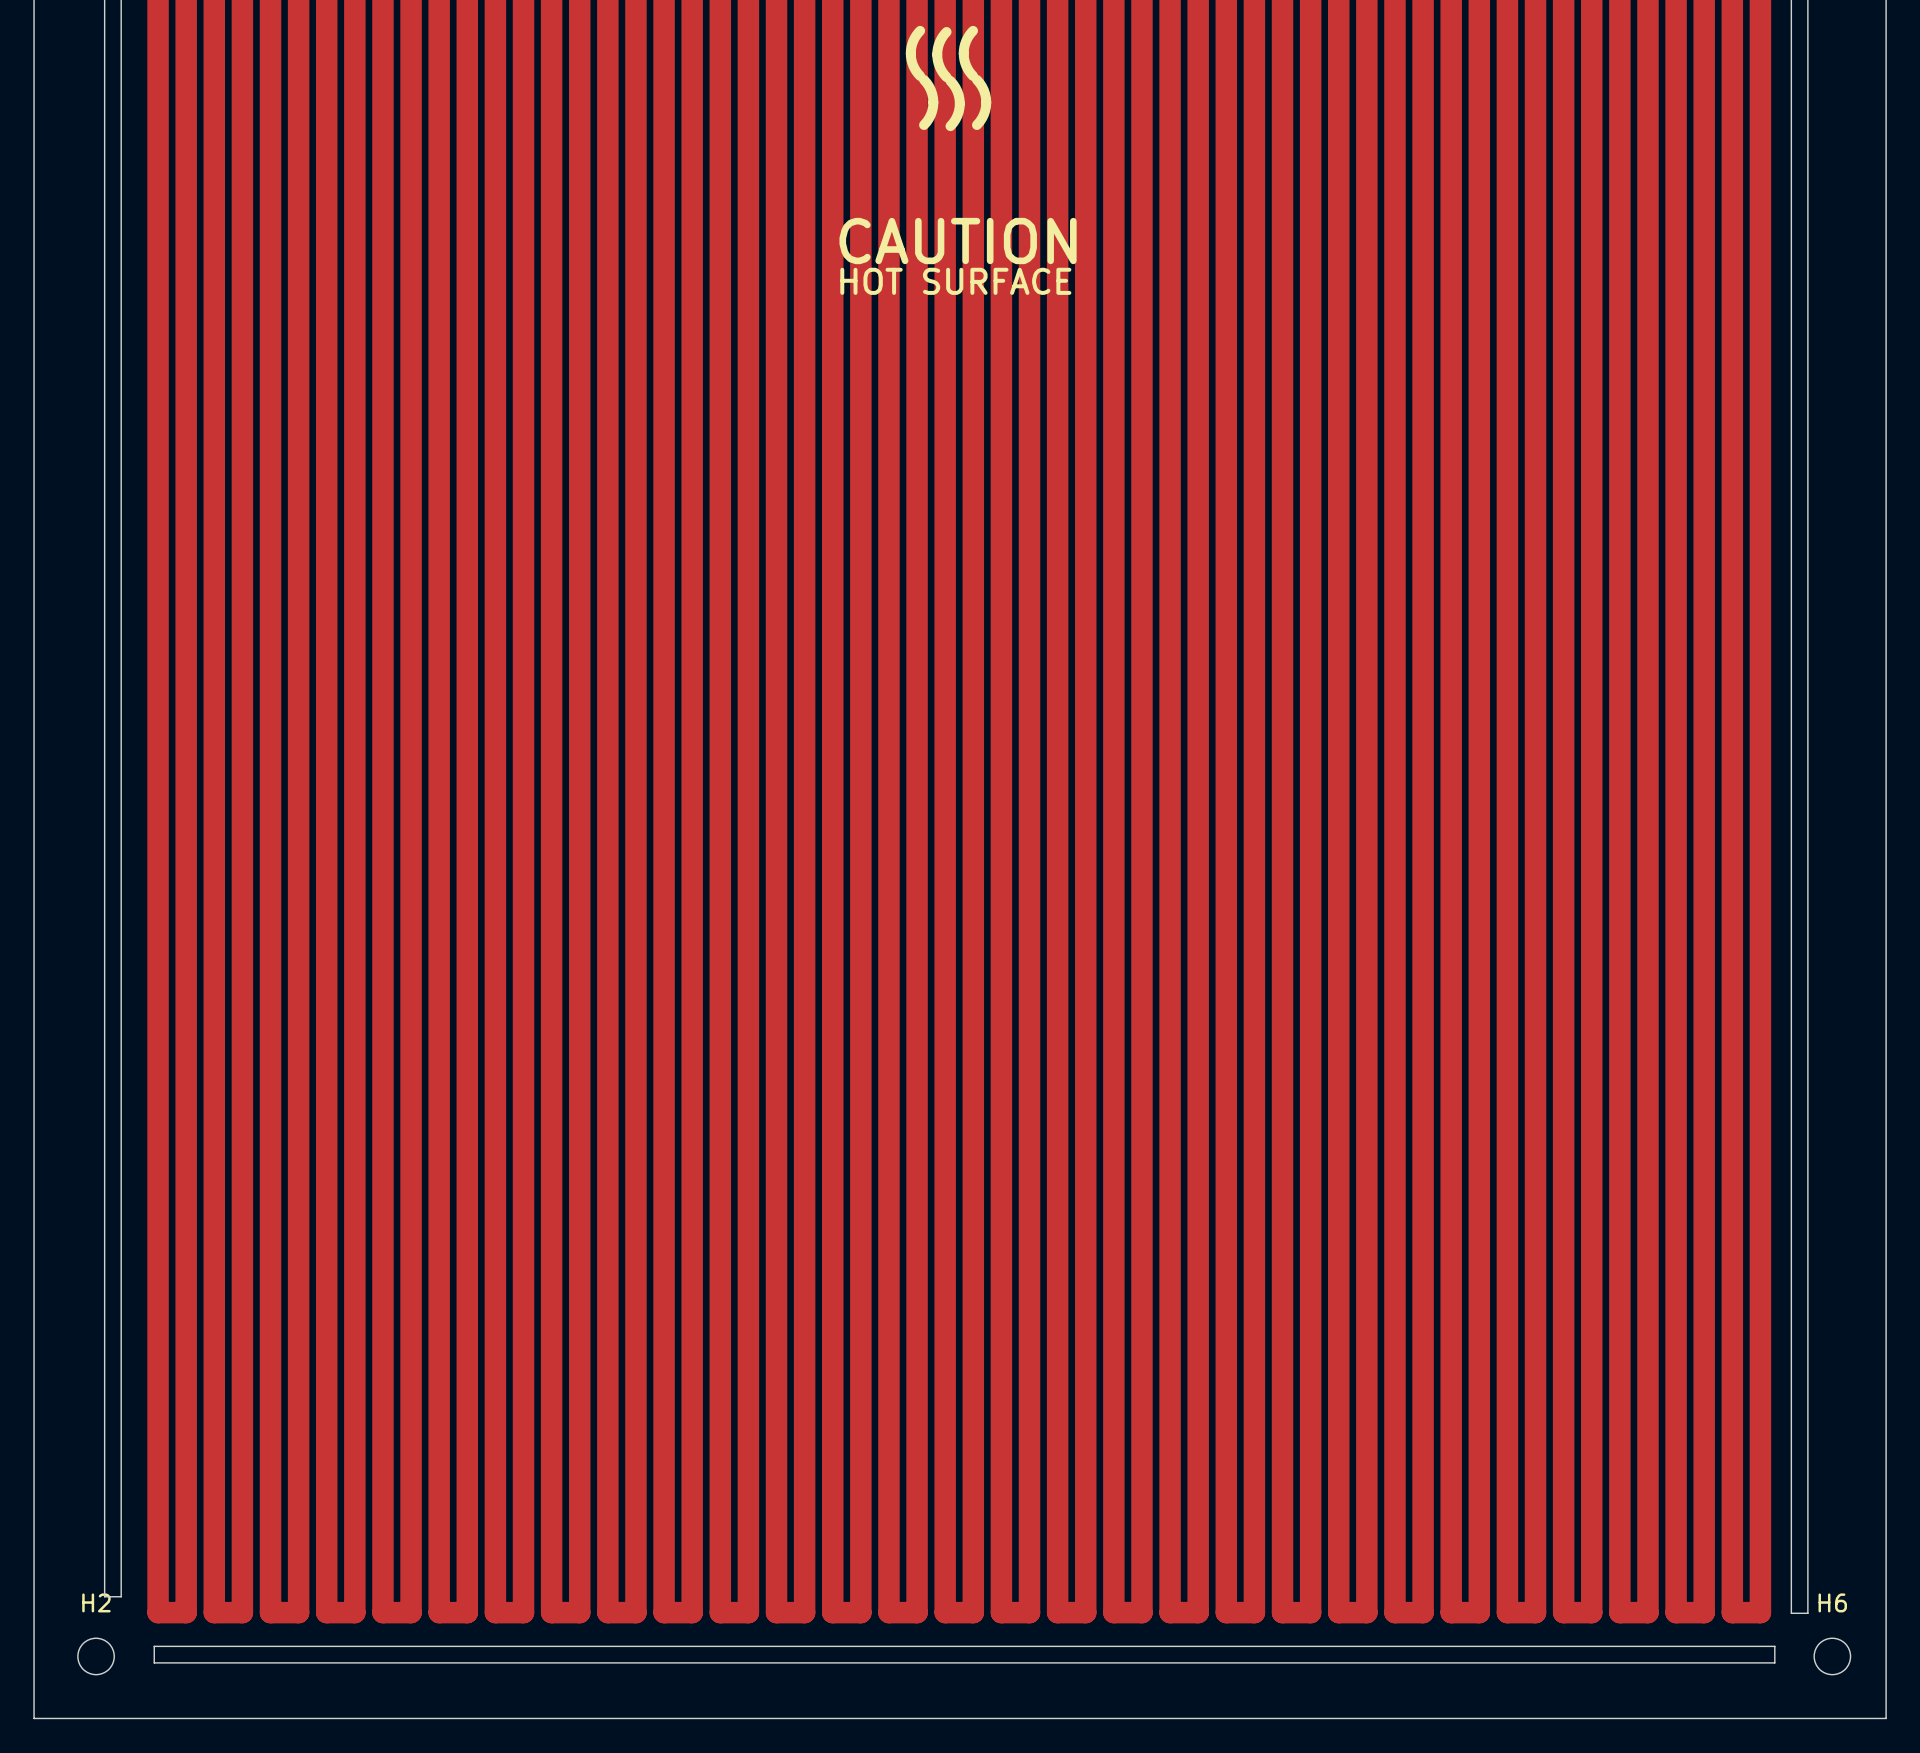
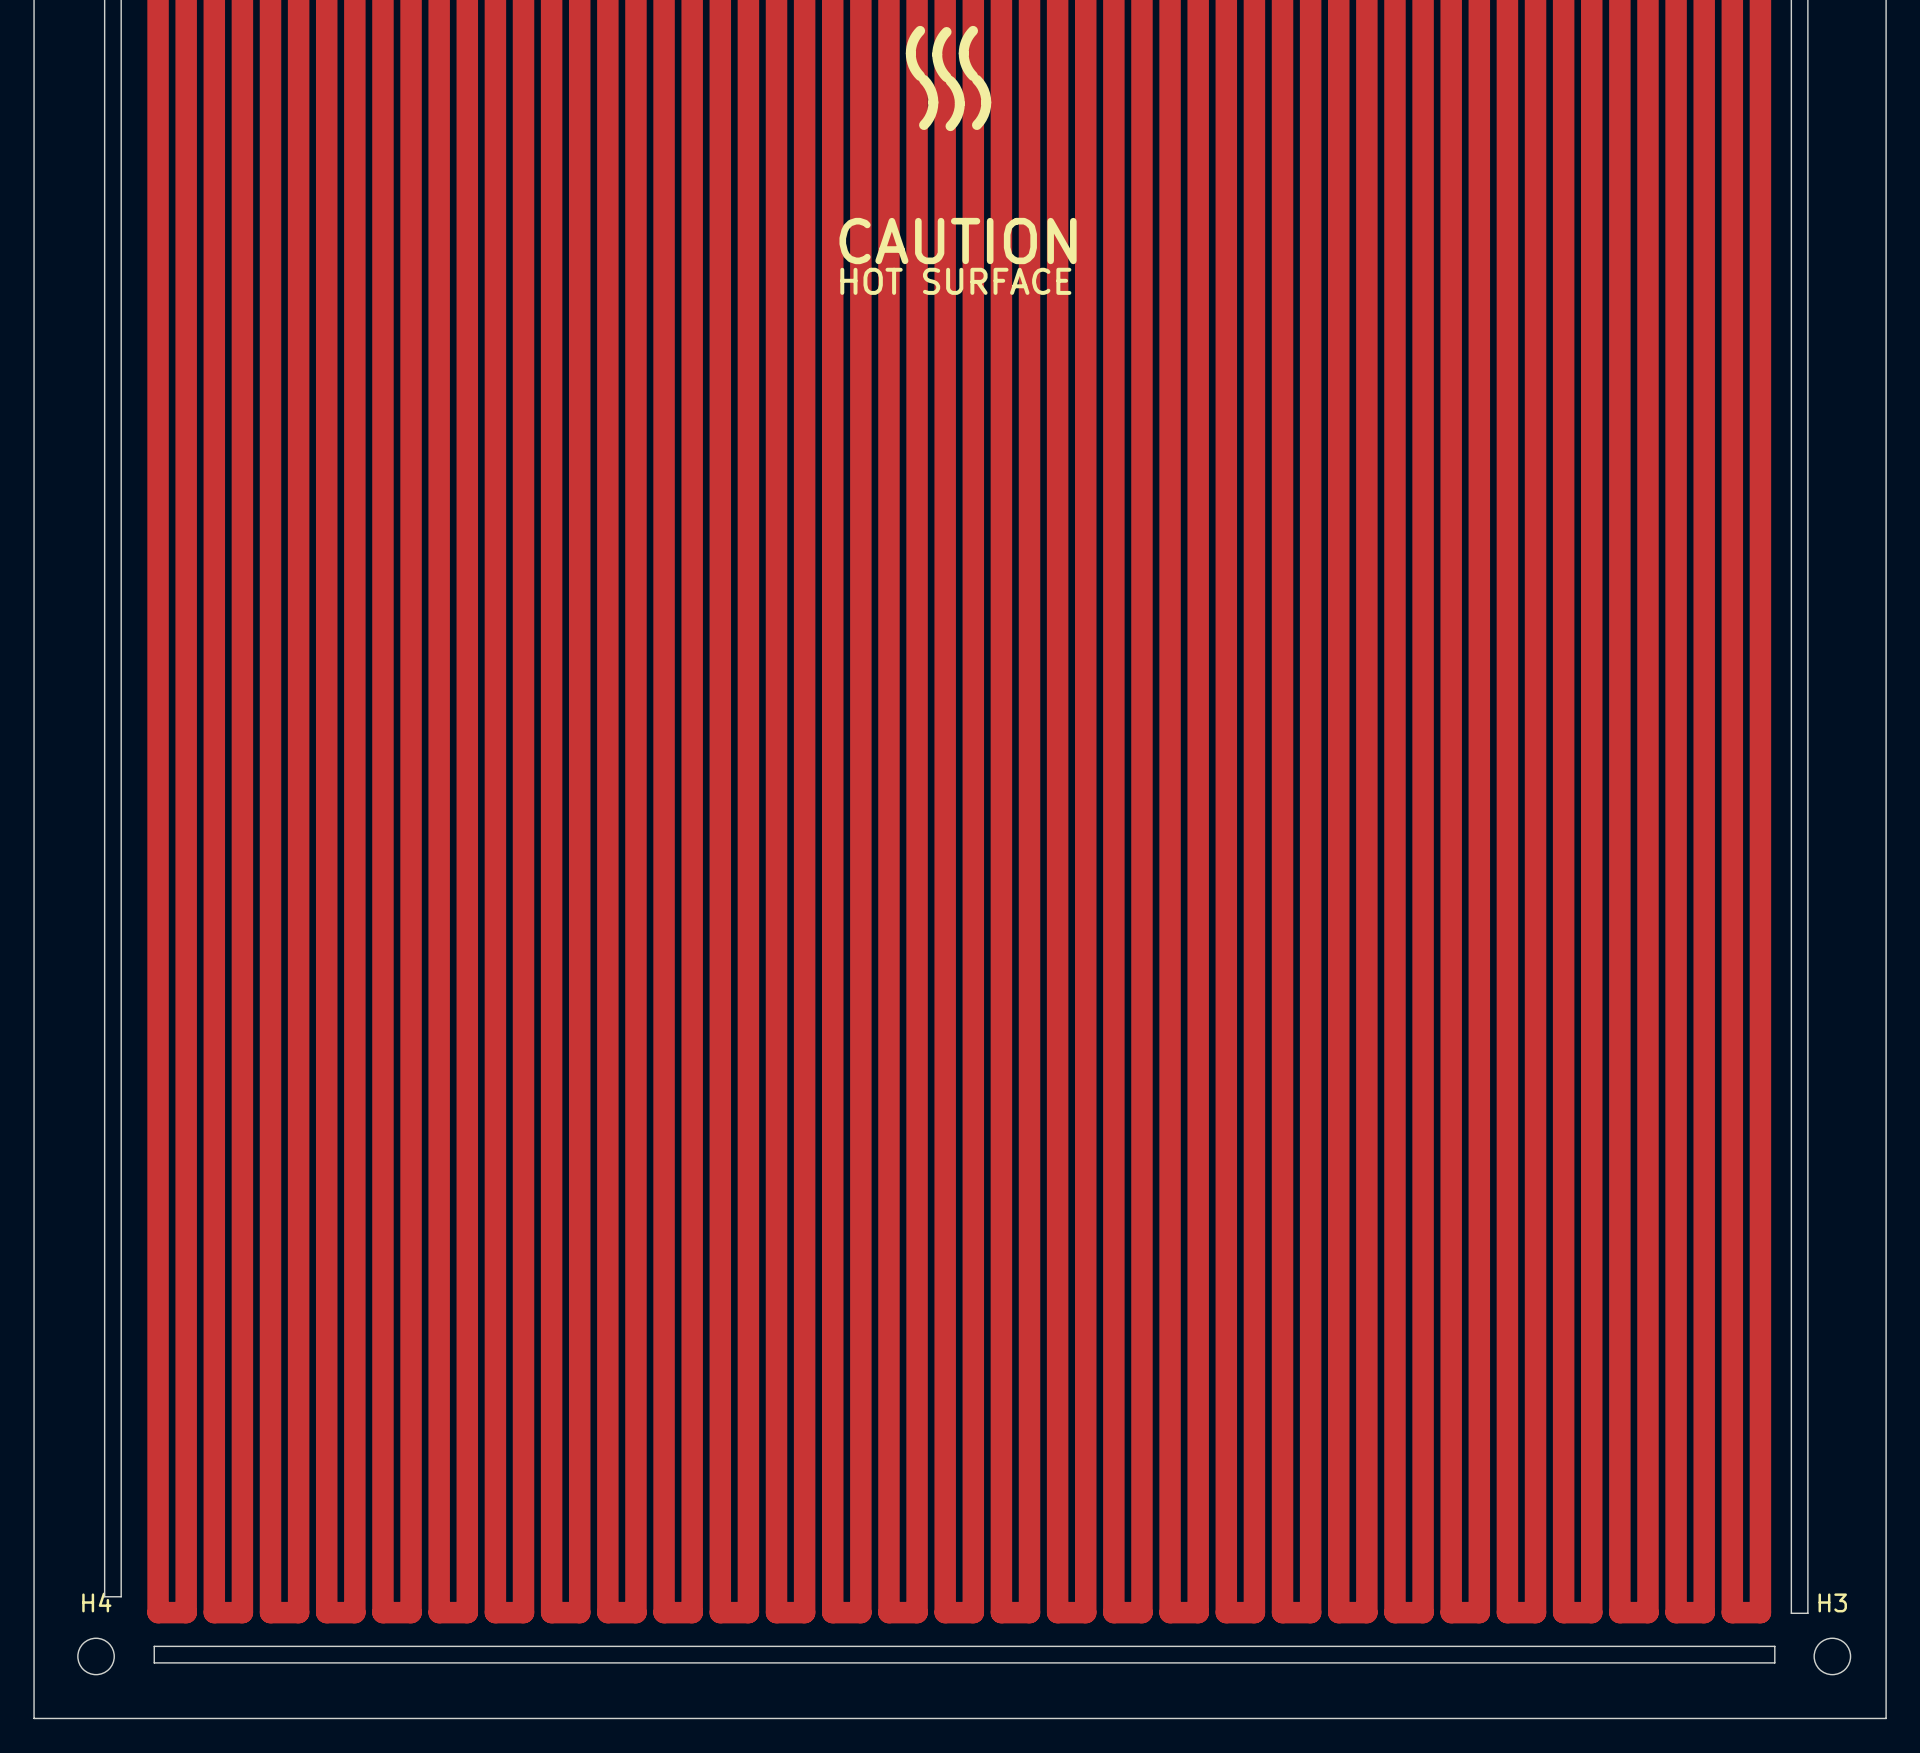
H2 name: H2 (96, 1602) -> H4 (96, 1602)
H6 name: H6 (1832, 1602) -> H3 (1832, 1602)

